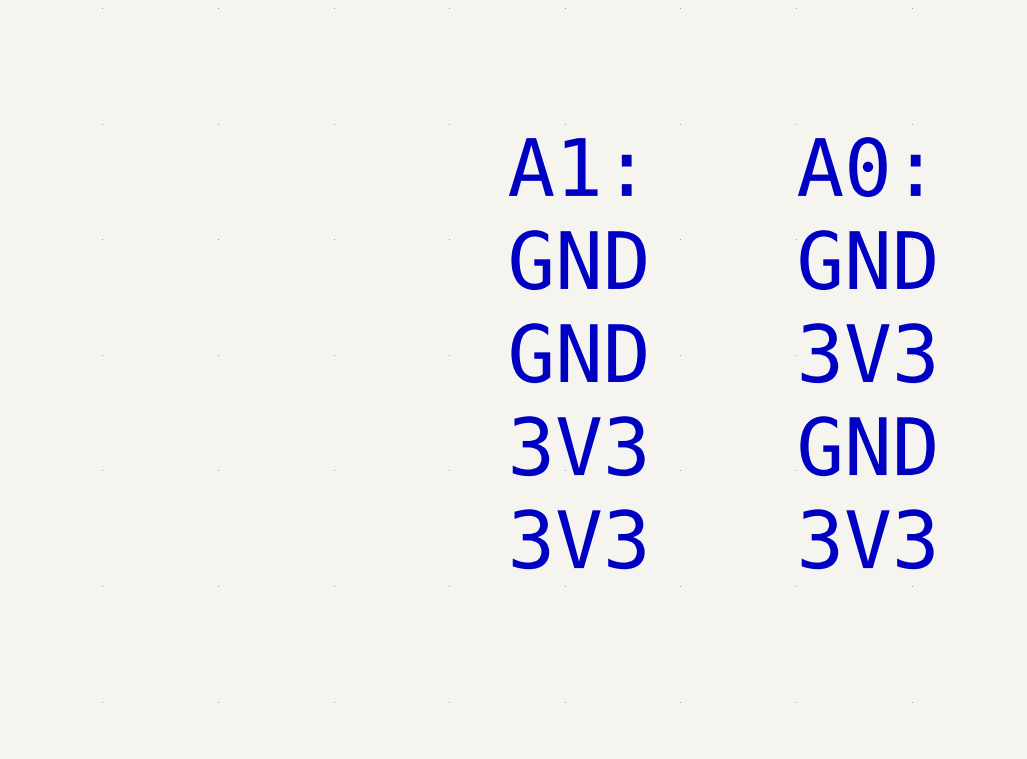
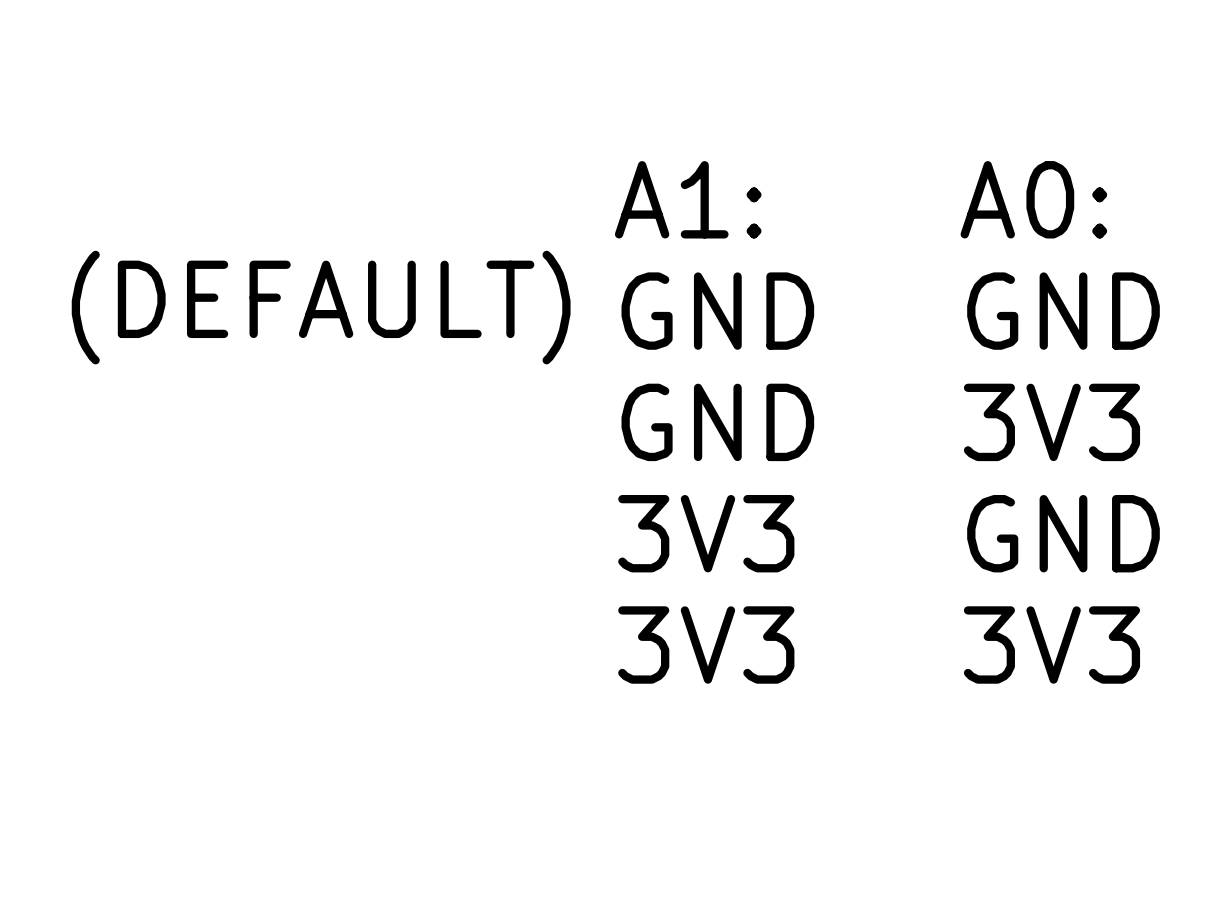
text: none -> (DEFAULT) (321, 307)

